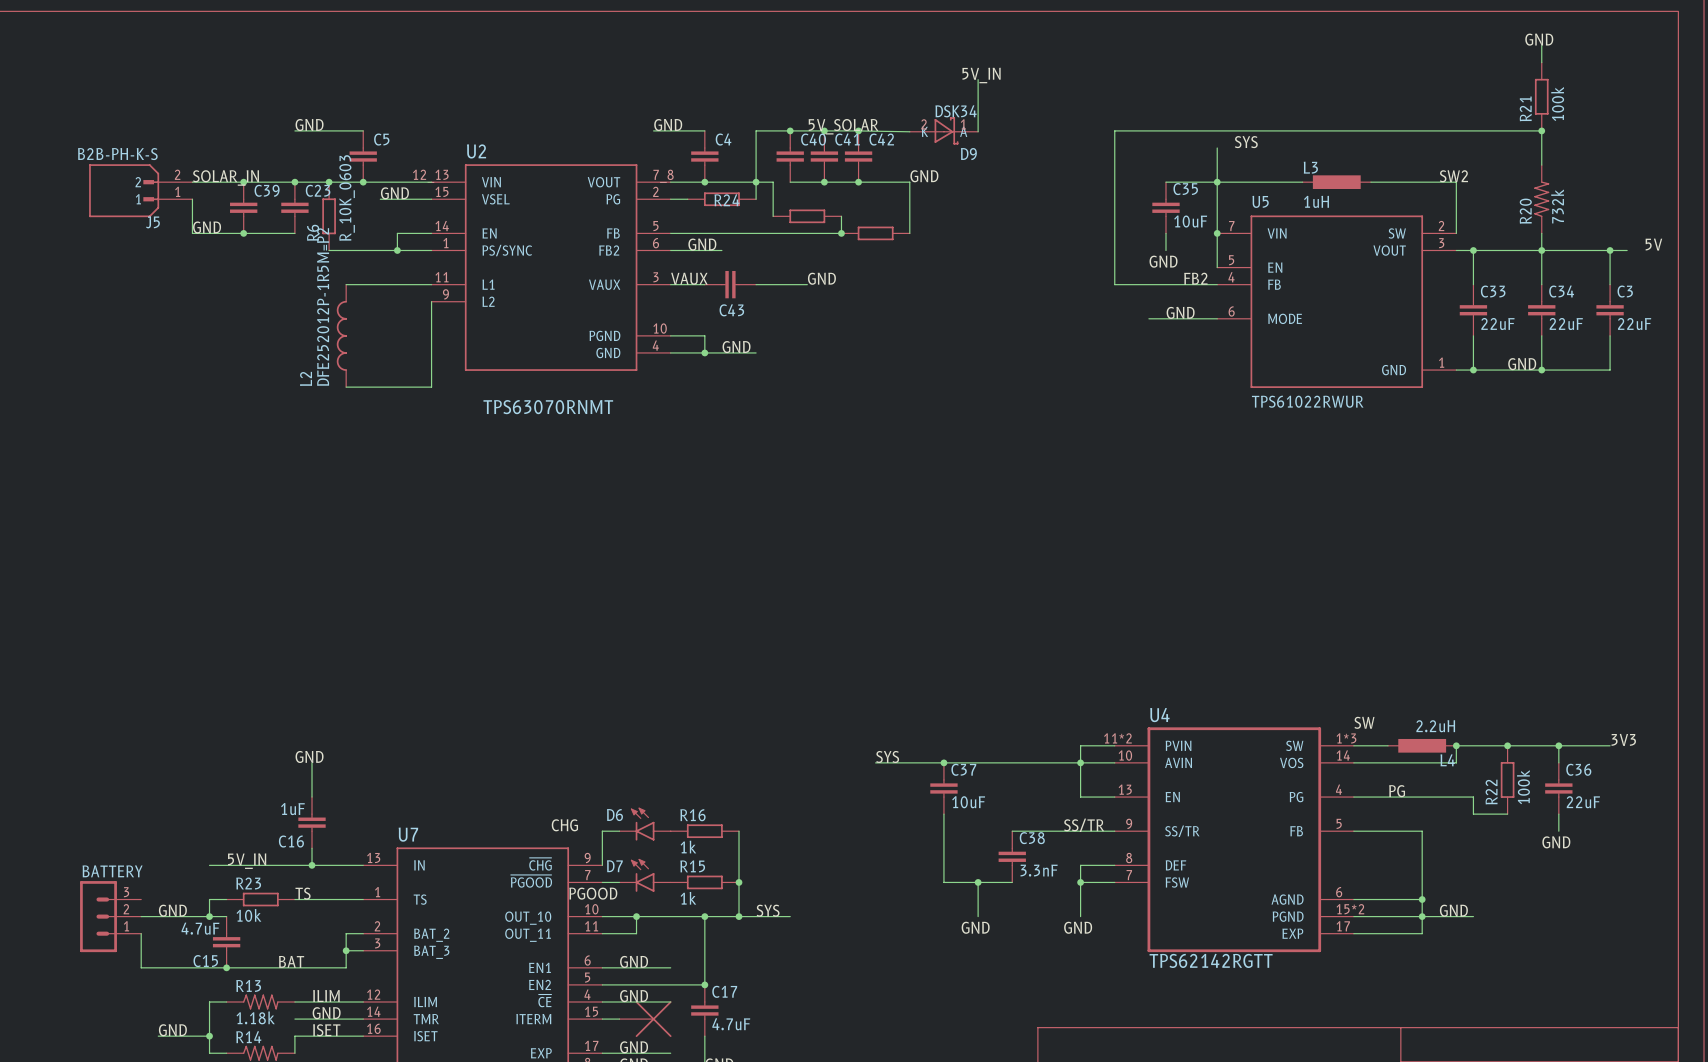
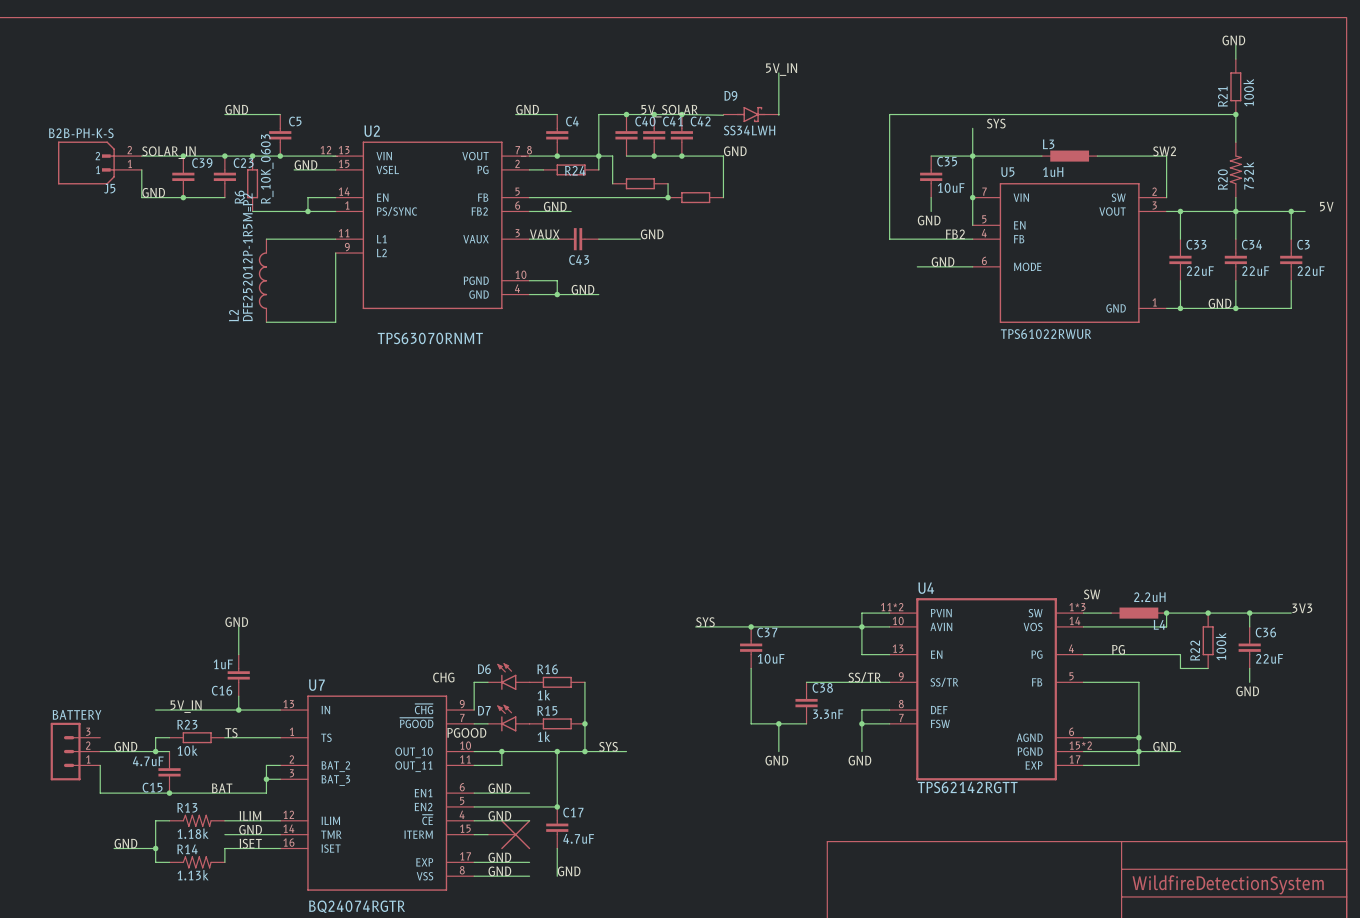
D9 value: DSK34 (956, 111) -> SS34LWH (749, 130)
D9 symbol: [909, 117, 979, 145] -> [723, 106, 779, 123]
D9 name position: D9 (968, 154) -> D9 (730, 95)

